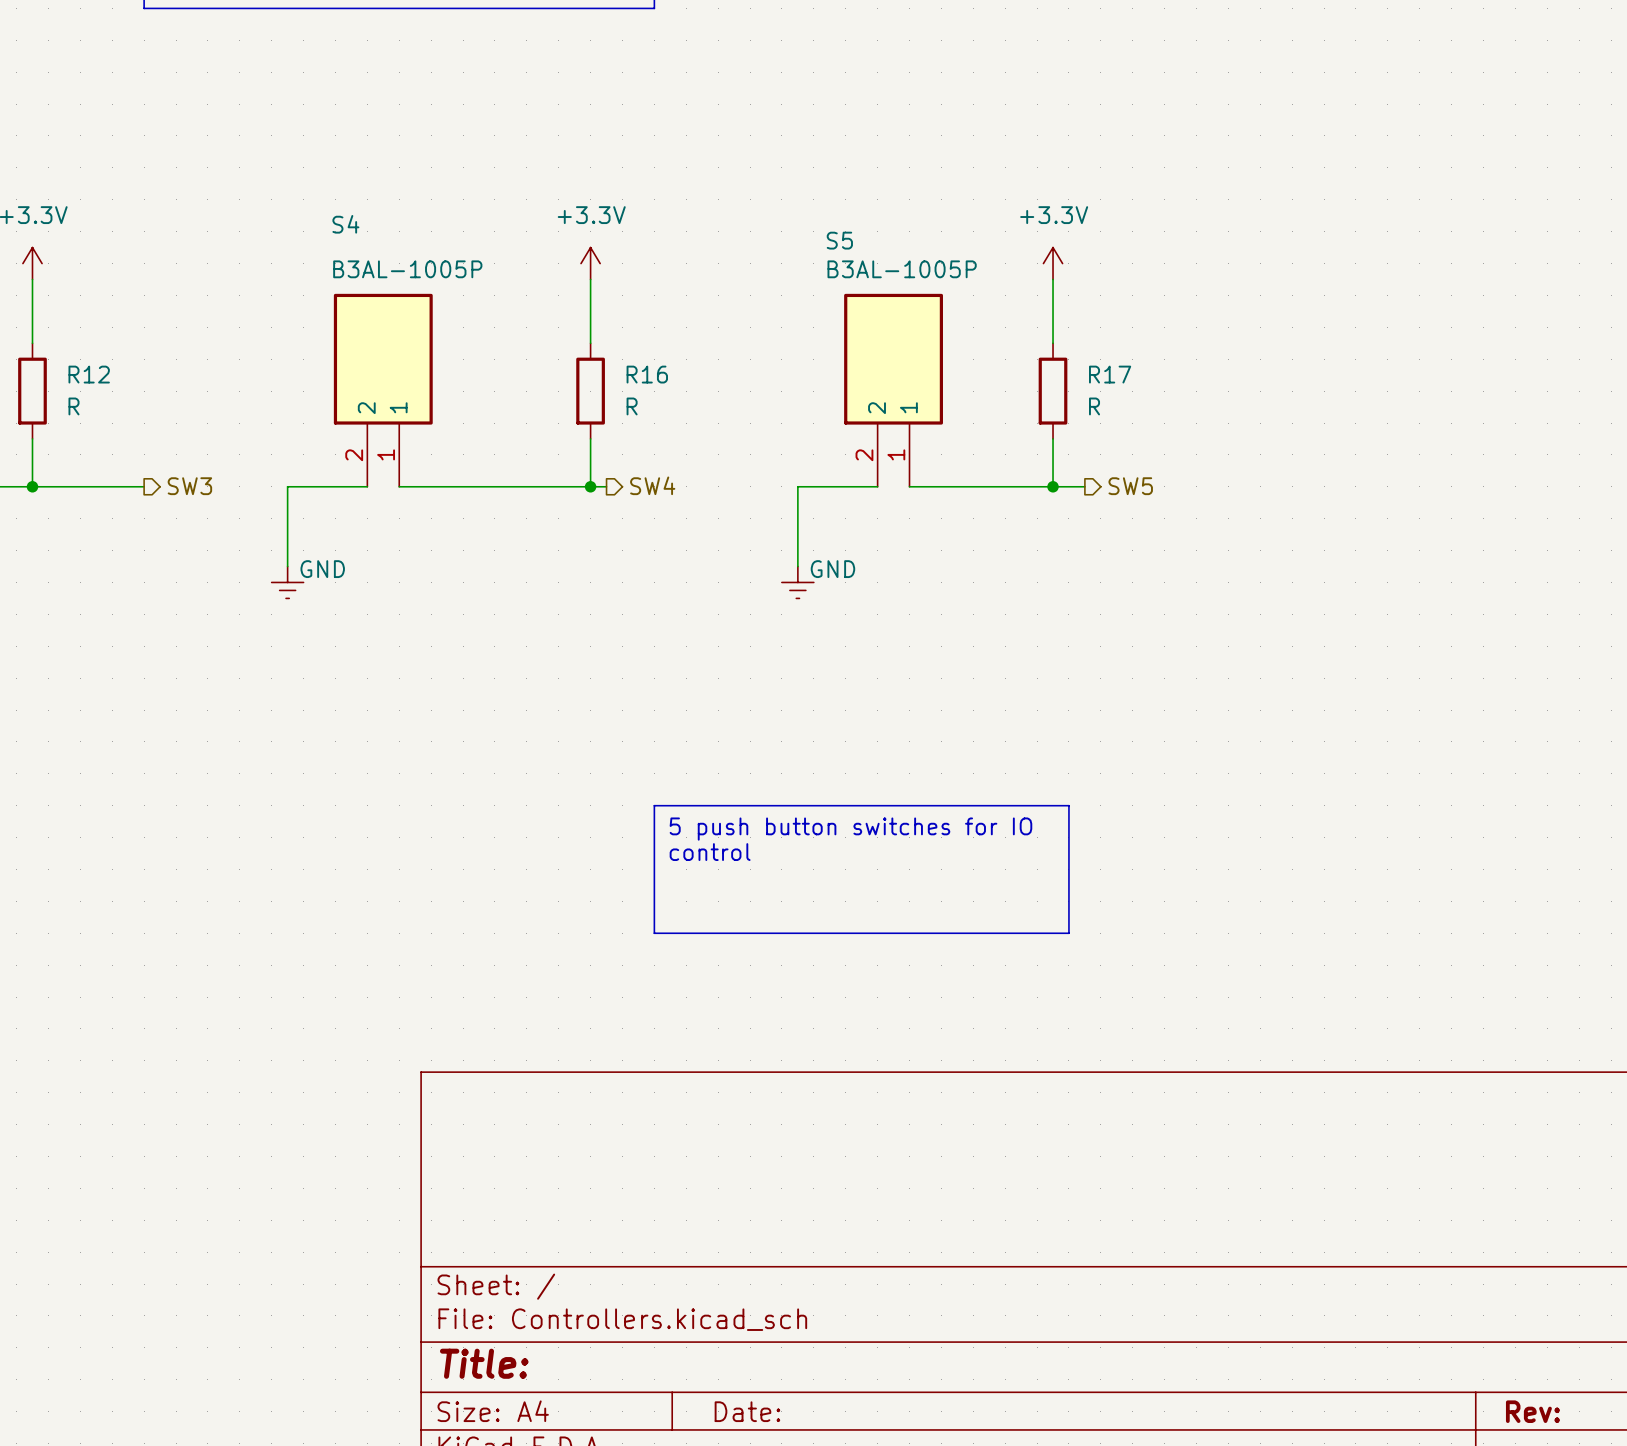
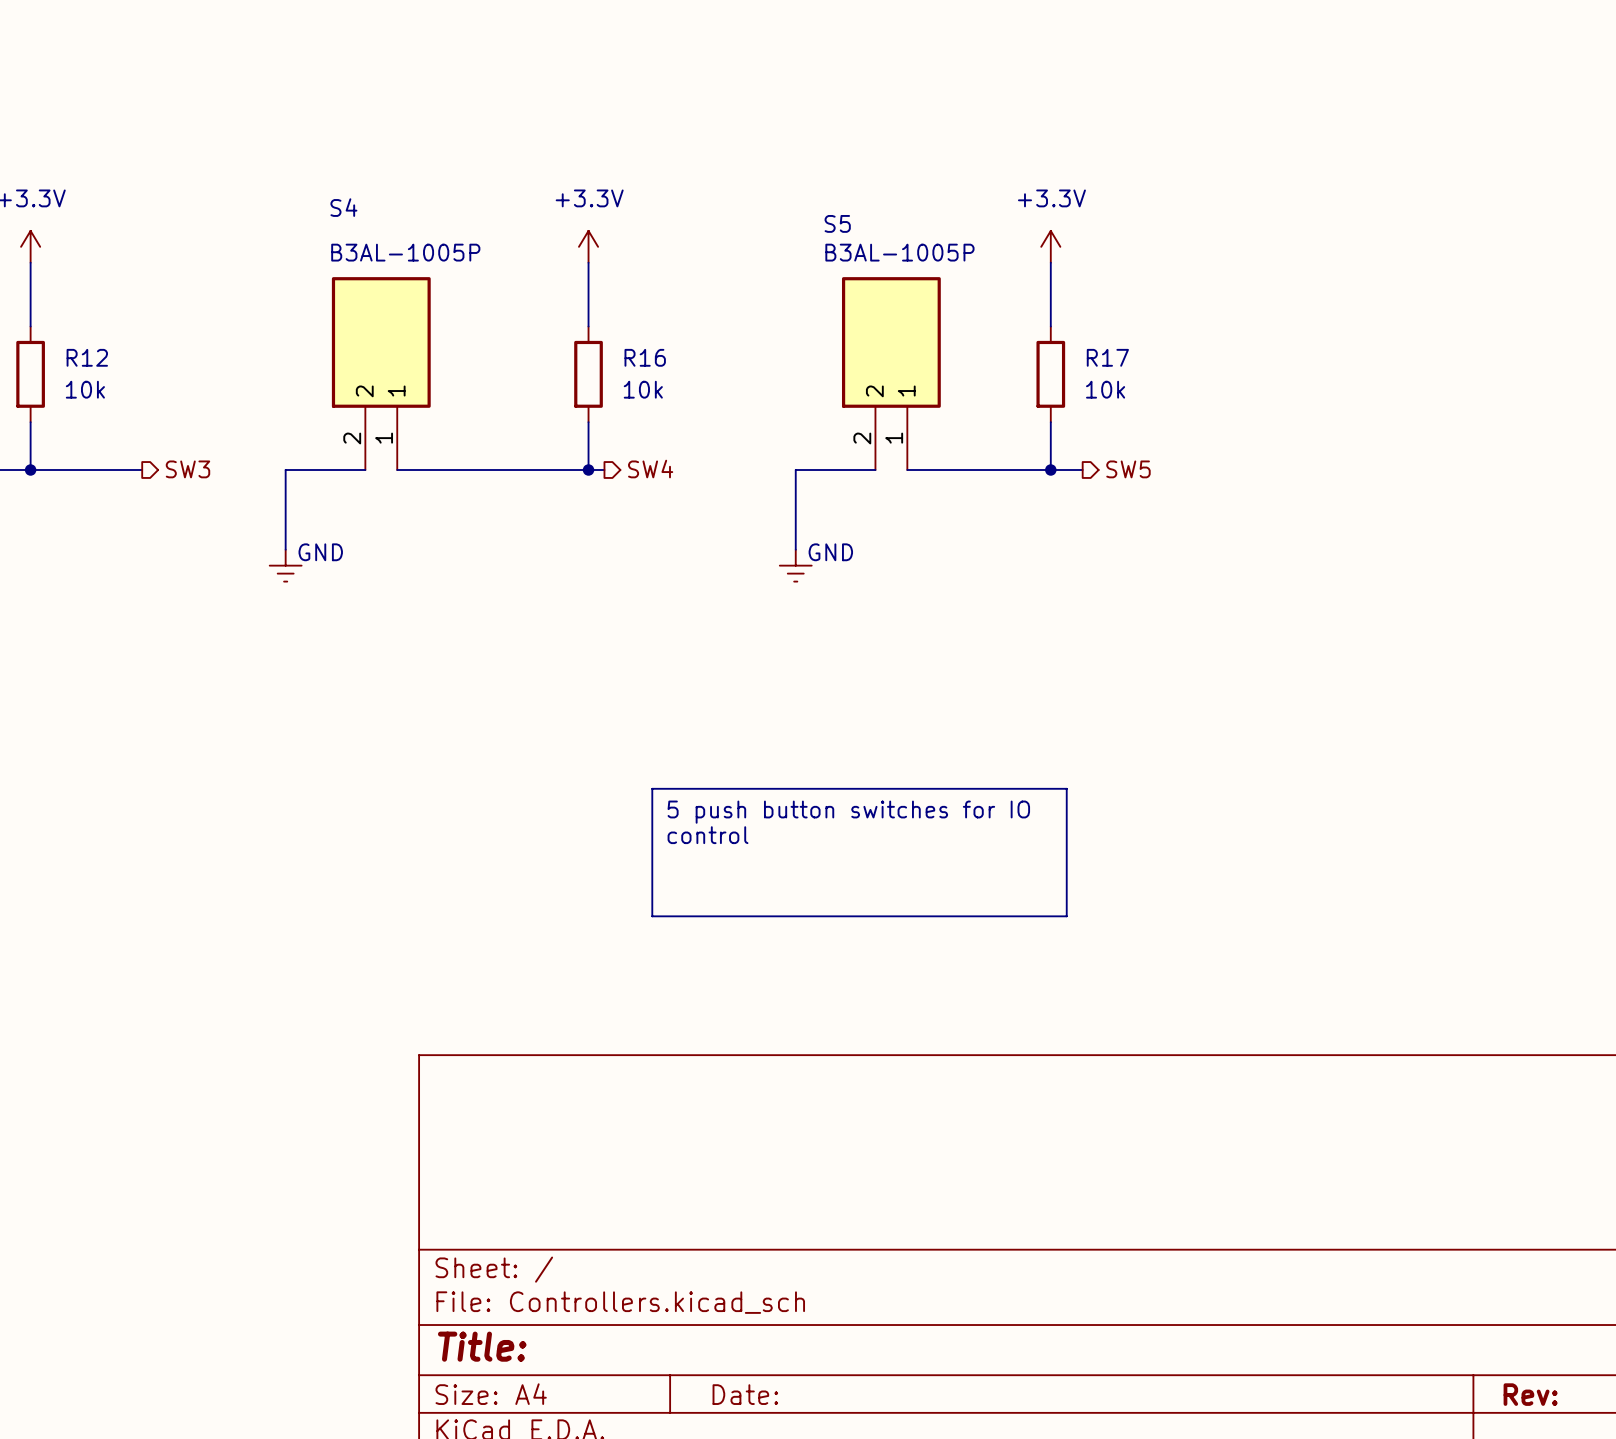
R12 value: R (73, 406) -> 10k (85, 389)
R16 value: R (632, 406) -> 10k (643, 389)
R17 value: R (1094, 406) -> 10k (1105, 389)

